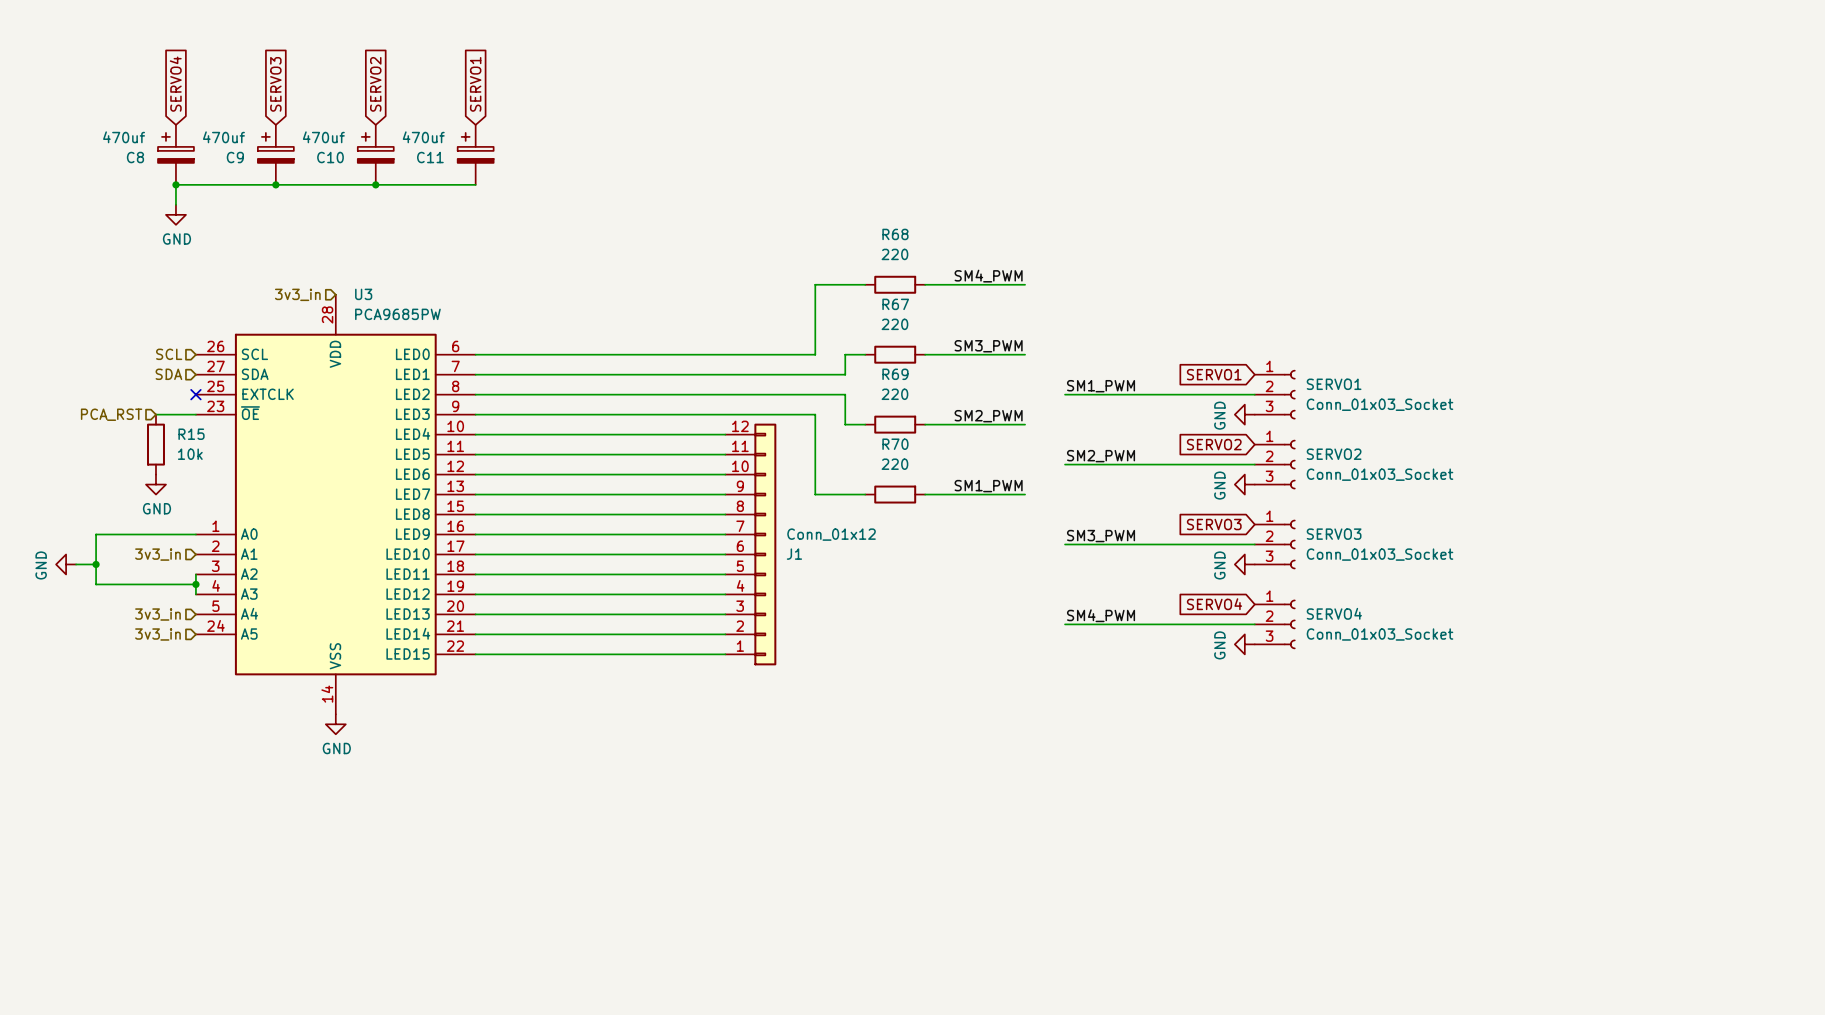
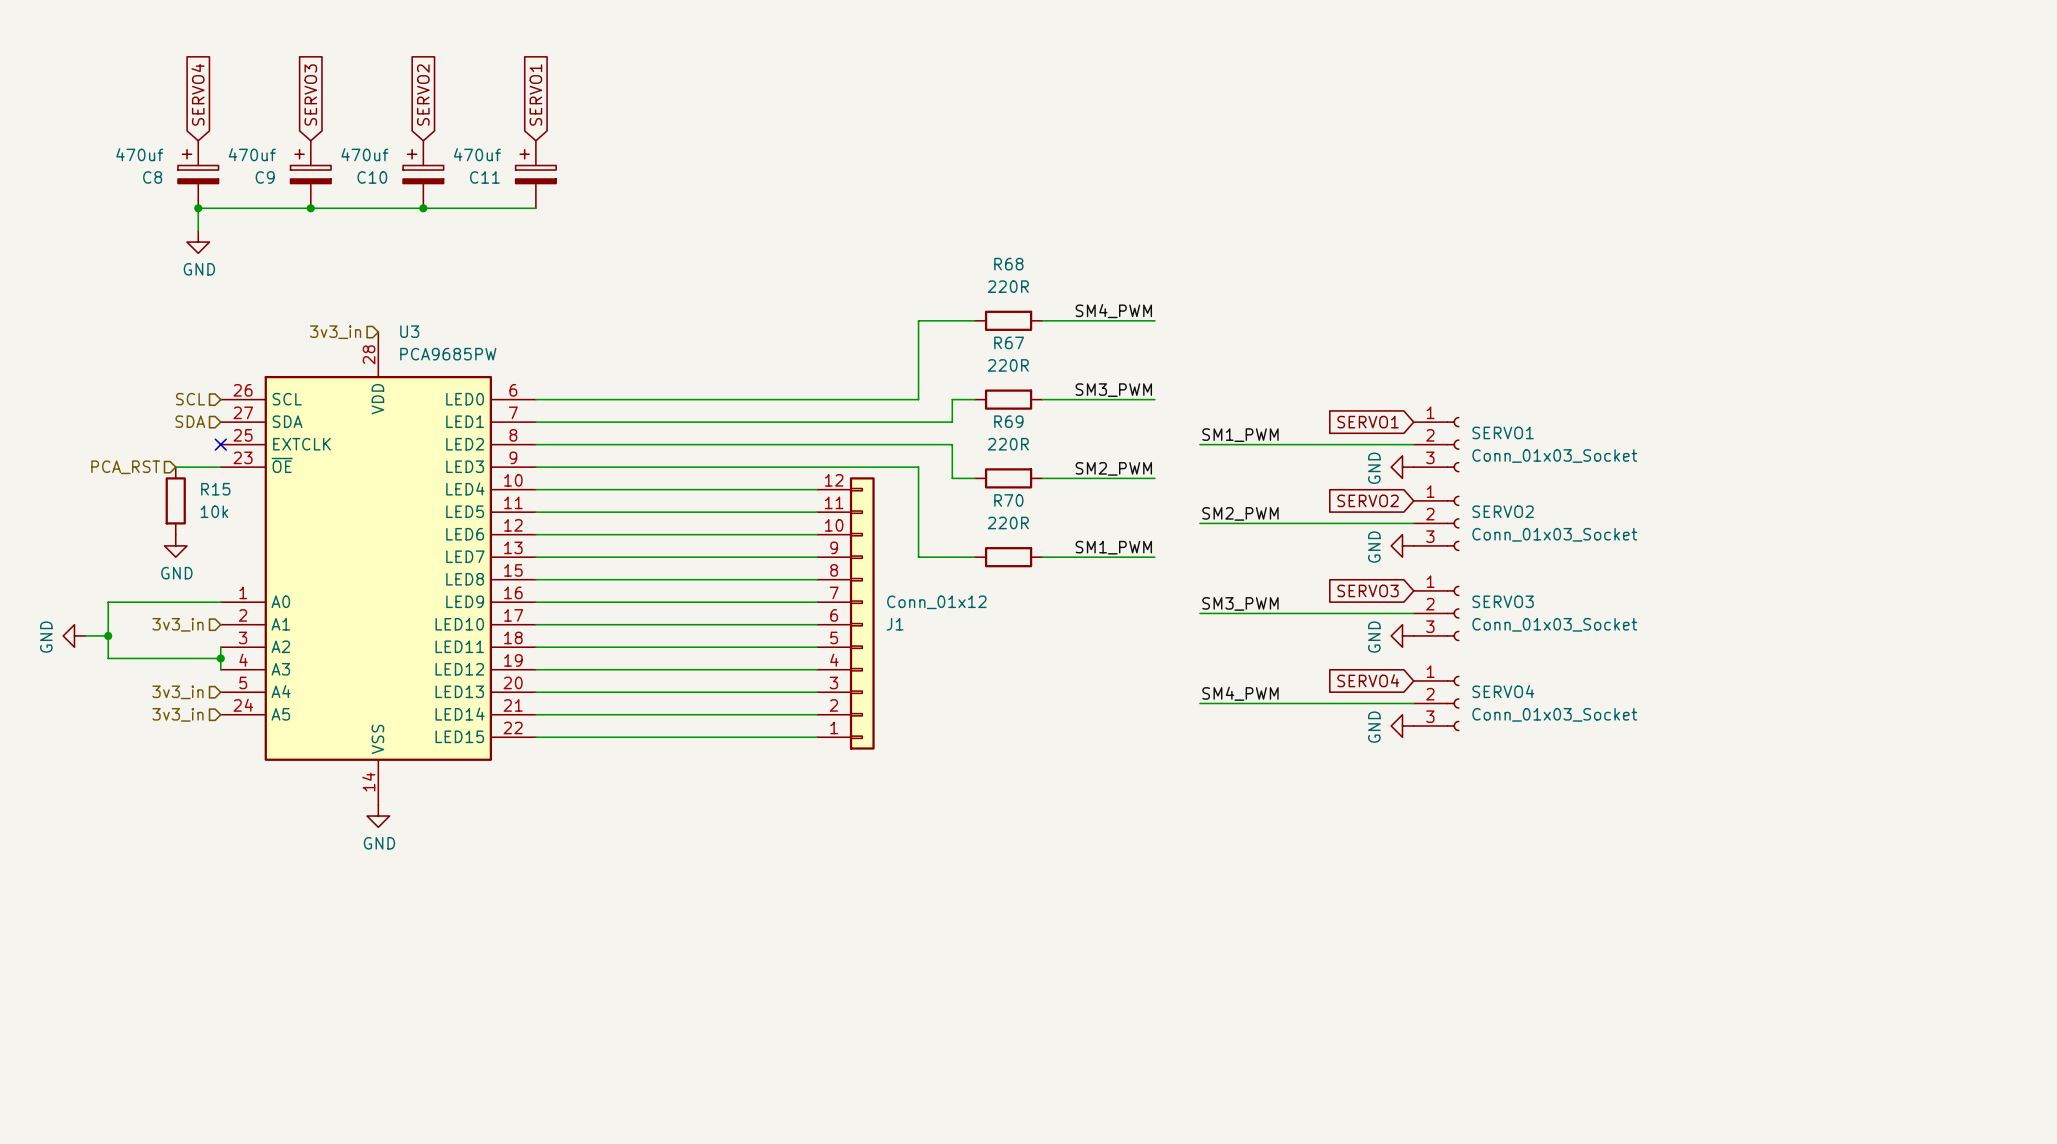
R68 value: 220 (894, 254) -> 220R (1008, 286)
R67 value: 220 (894, 324) -> 220R (1008, 365)
R69 value: 220 (894, 394) -> 220R (1008, 444)
R70 value: 220 (894, 464) -> 220R (1008, 522)

